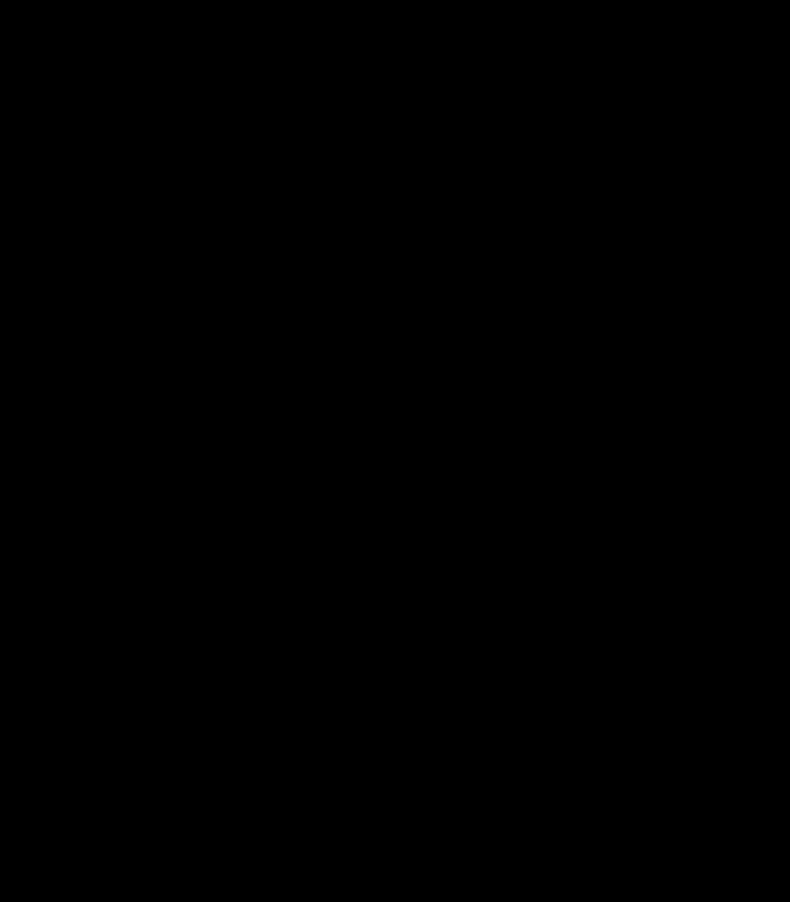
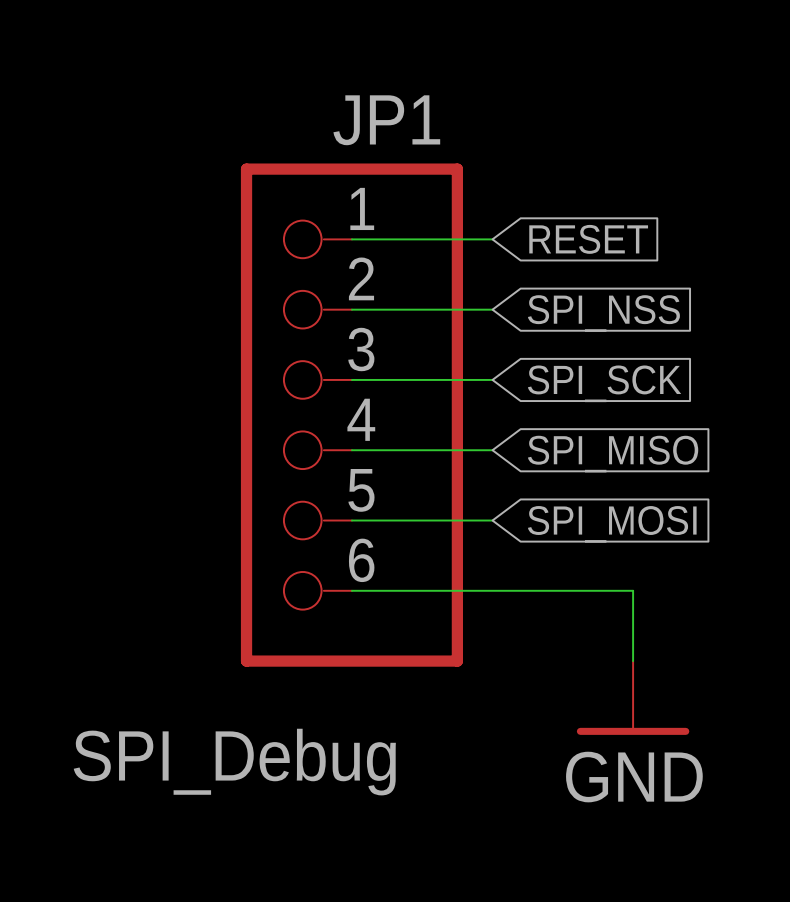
wire: none -> (351, 239) (492, 239)
global label: none -> RESET (588, 239)
wire: none -> (351, 309) (492, 309)
global label: none -> SPI_NSS (603, 313)
wire: none -> (351, 379) (492, 379)
global label: none -> SPI_SCK (604, 383)
JP1: none -> SPI_Debug (351, 415)
wire: none -> (351, 450) (492, 450)
global label: none -> SPI_MISO (613, 454)
wire: none -> (351, 520) (492, 520)
global label: none -> SPI_MOSI (612, 524)
wire: none -> (351, 590) (633, 590) (633, 661)
power symbol: none -> GND (633, 697)

